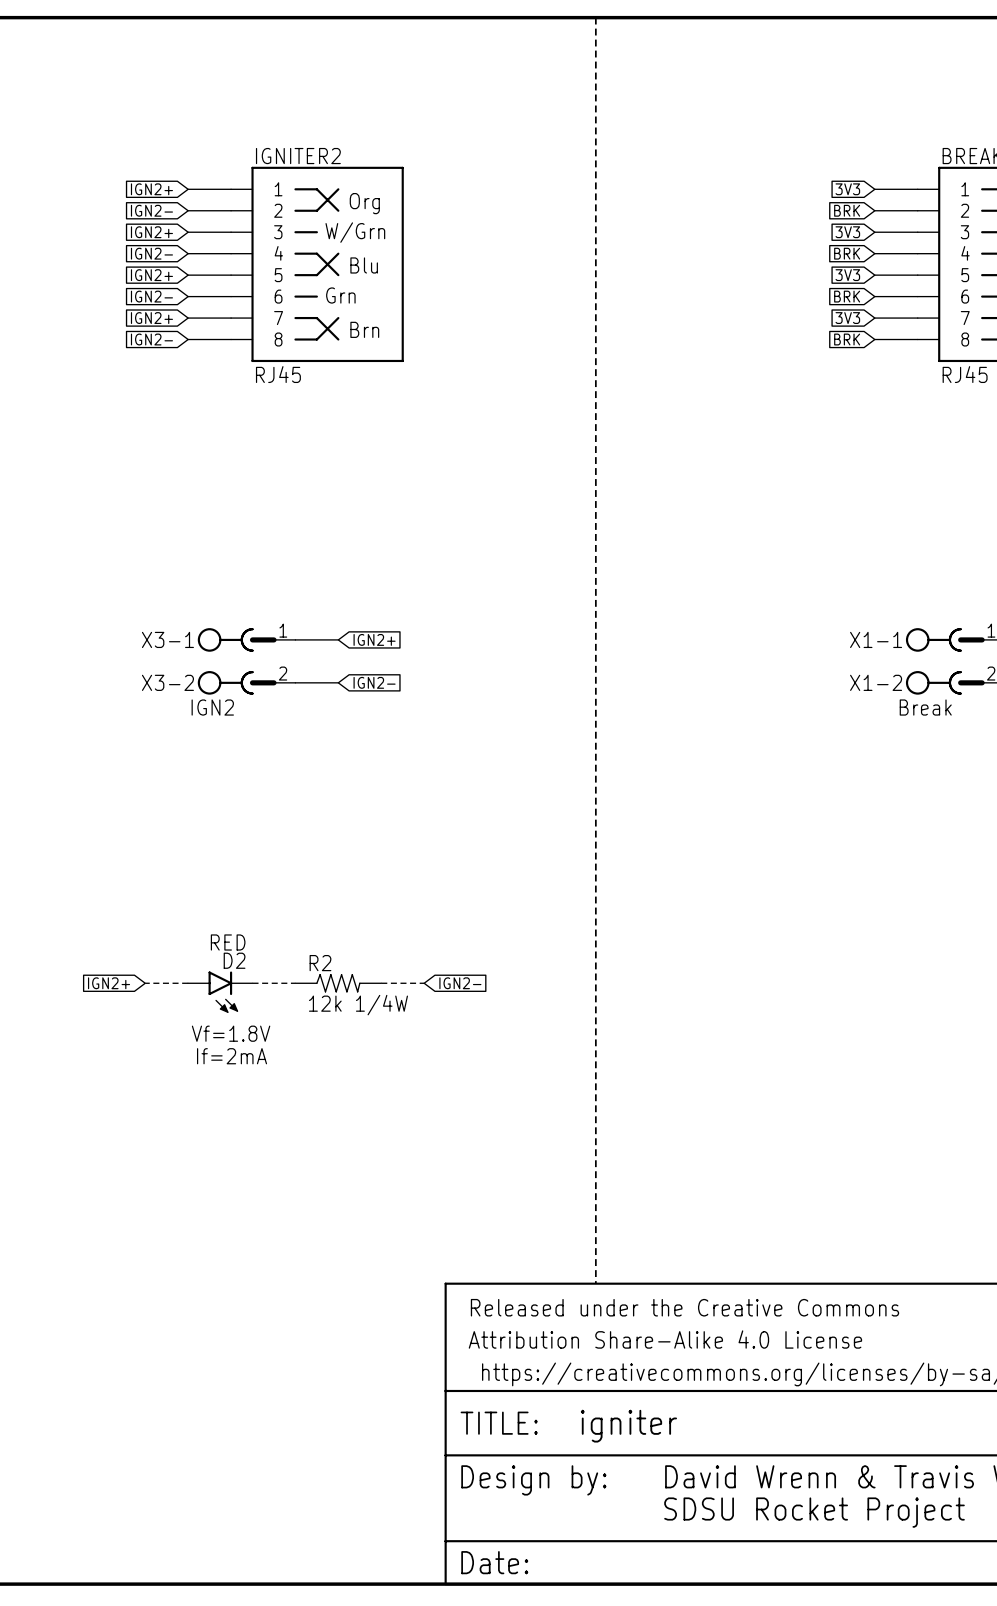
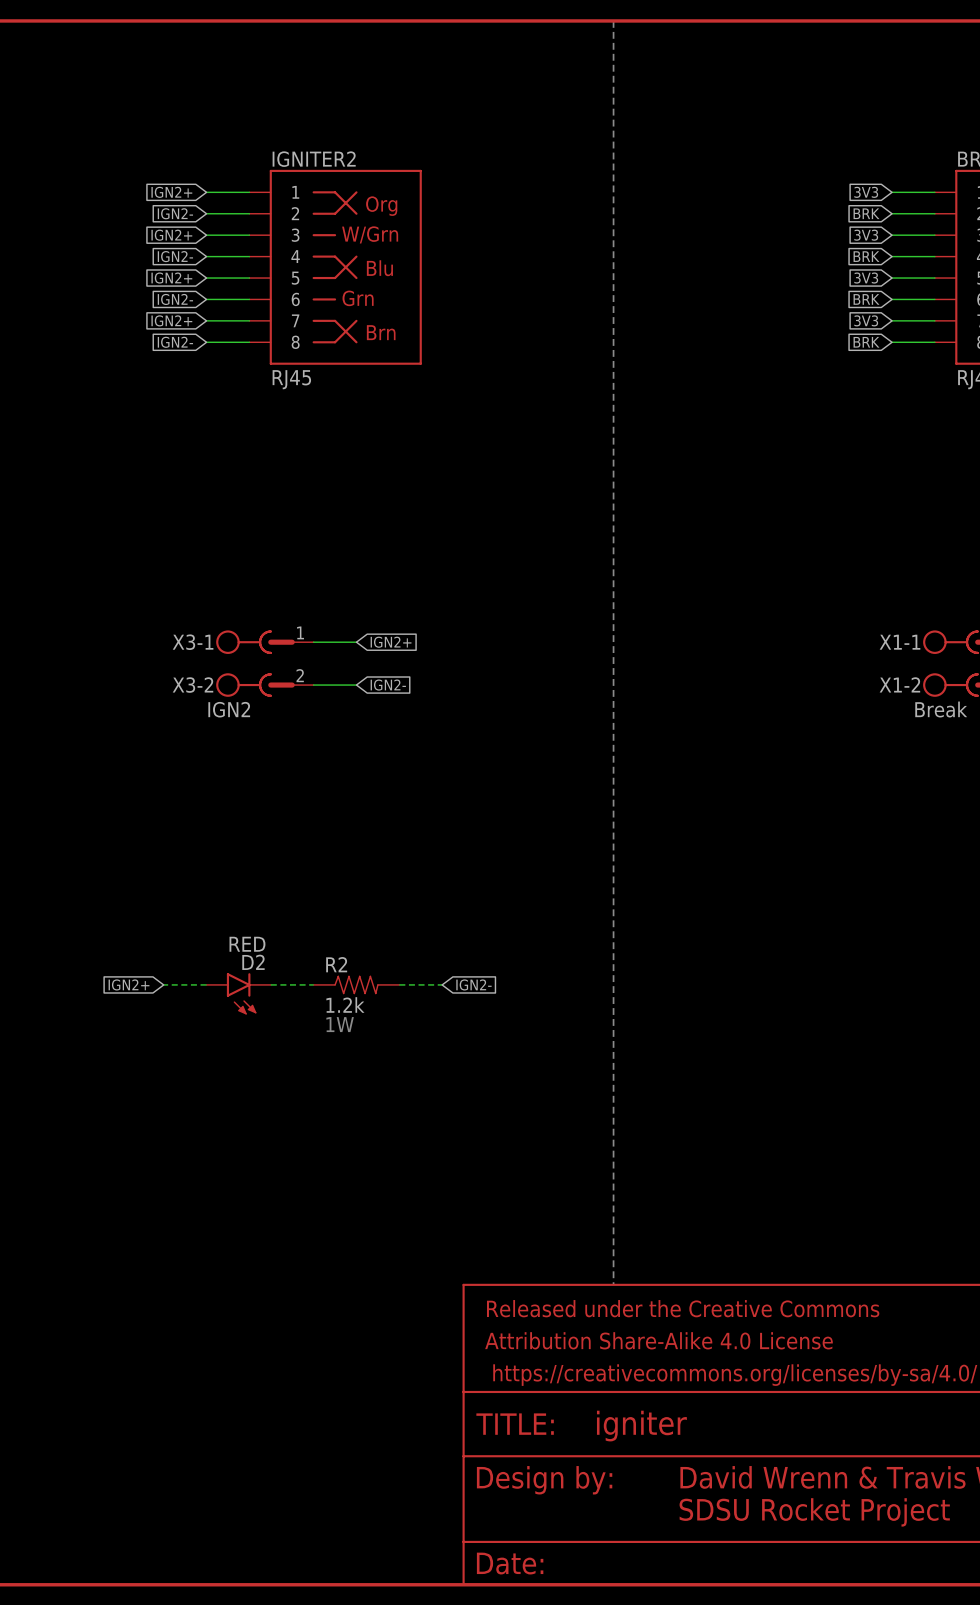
R2 value: 12k 1/4W (358, 1005) -> 1.2k (345, 1004)
text: none -> 1W (340, 1024)
text: Vf=1.8V (231, 1033) -> none
text: If=2mA (232, 1056) -> none

